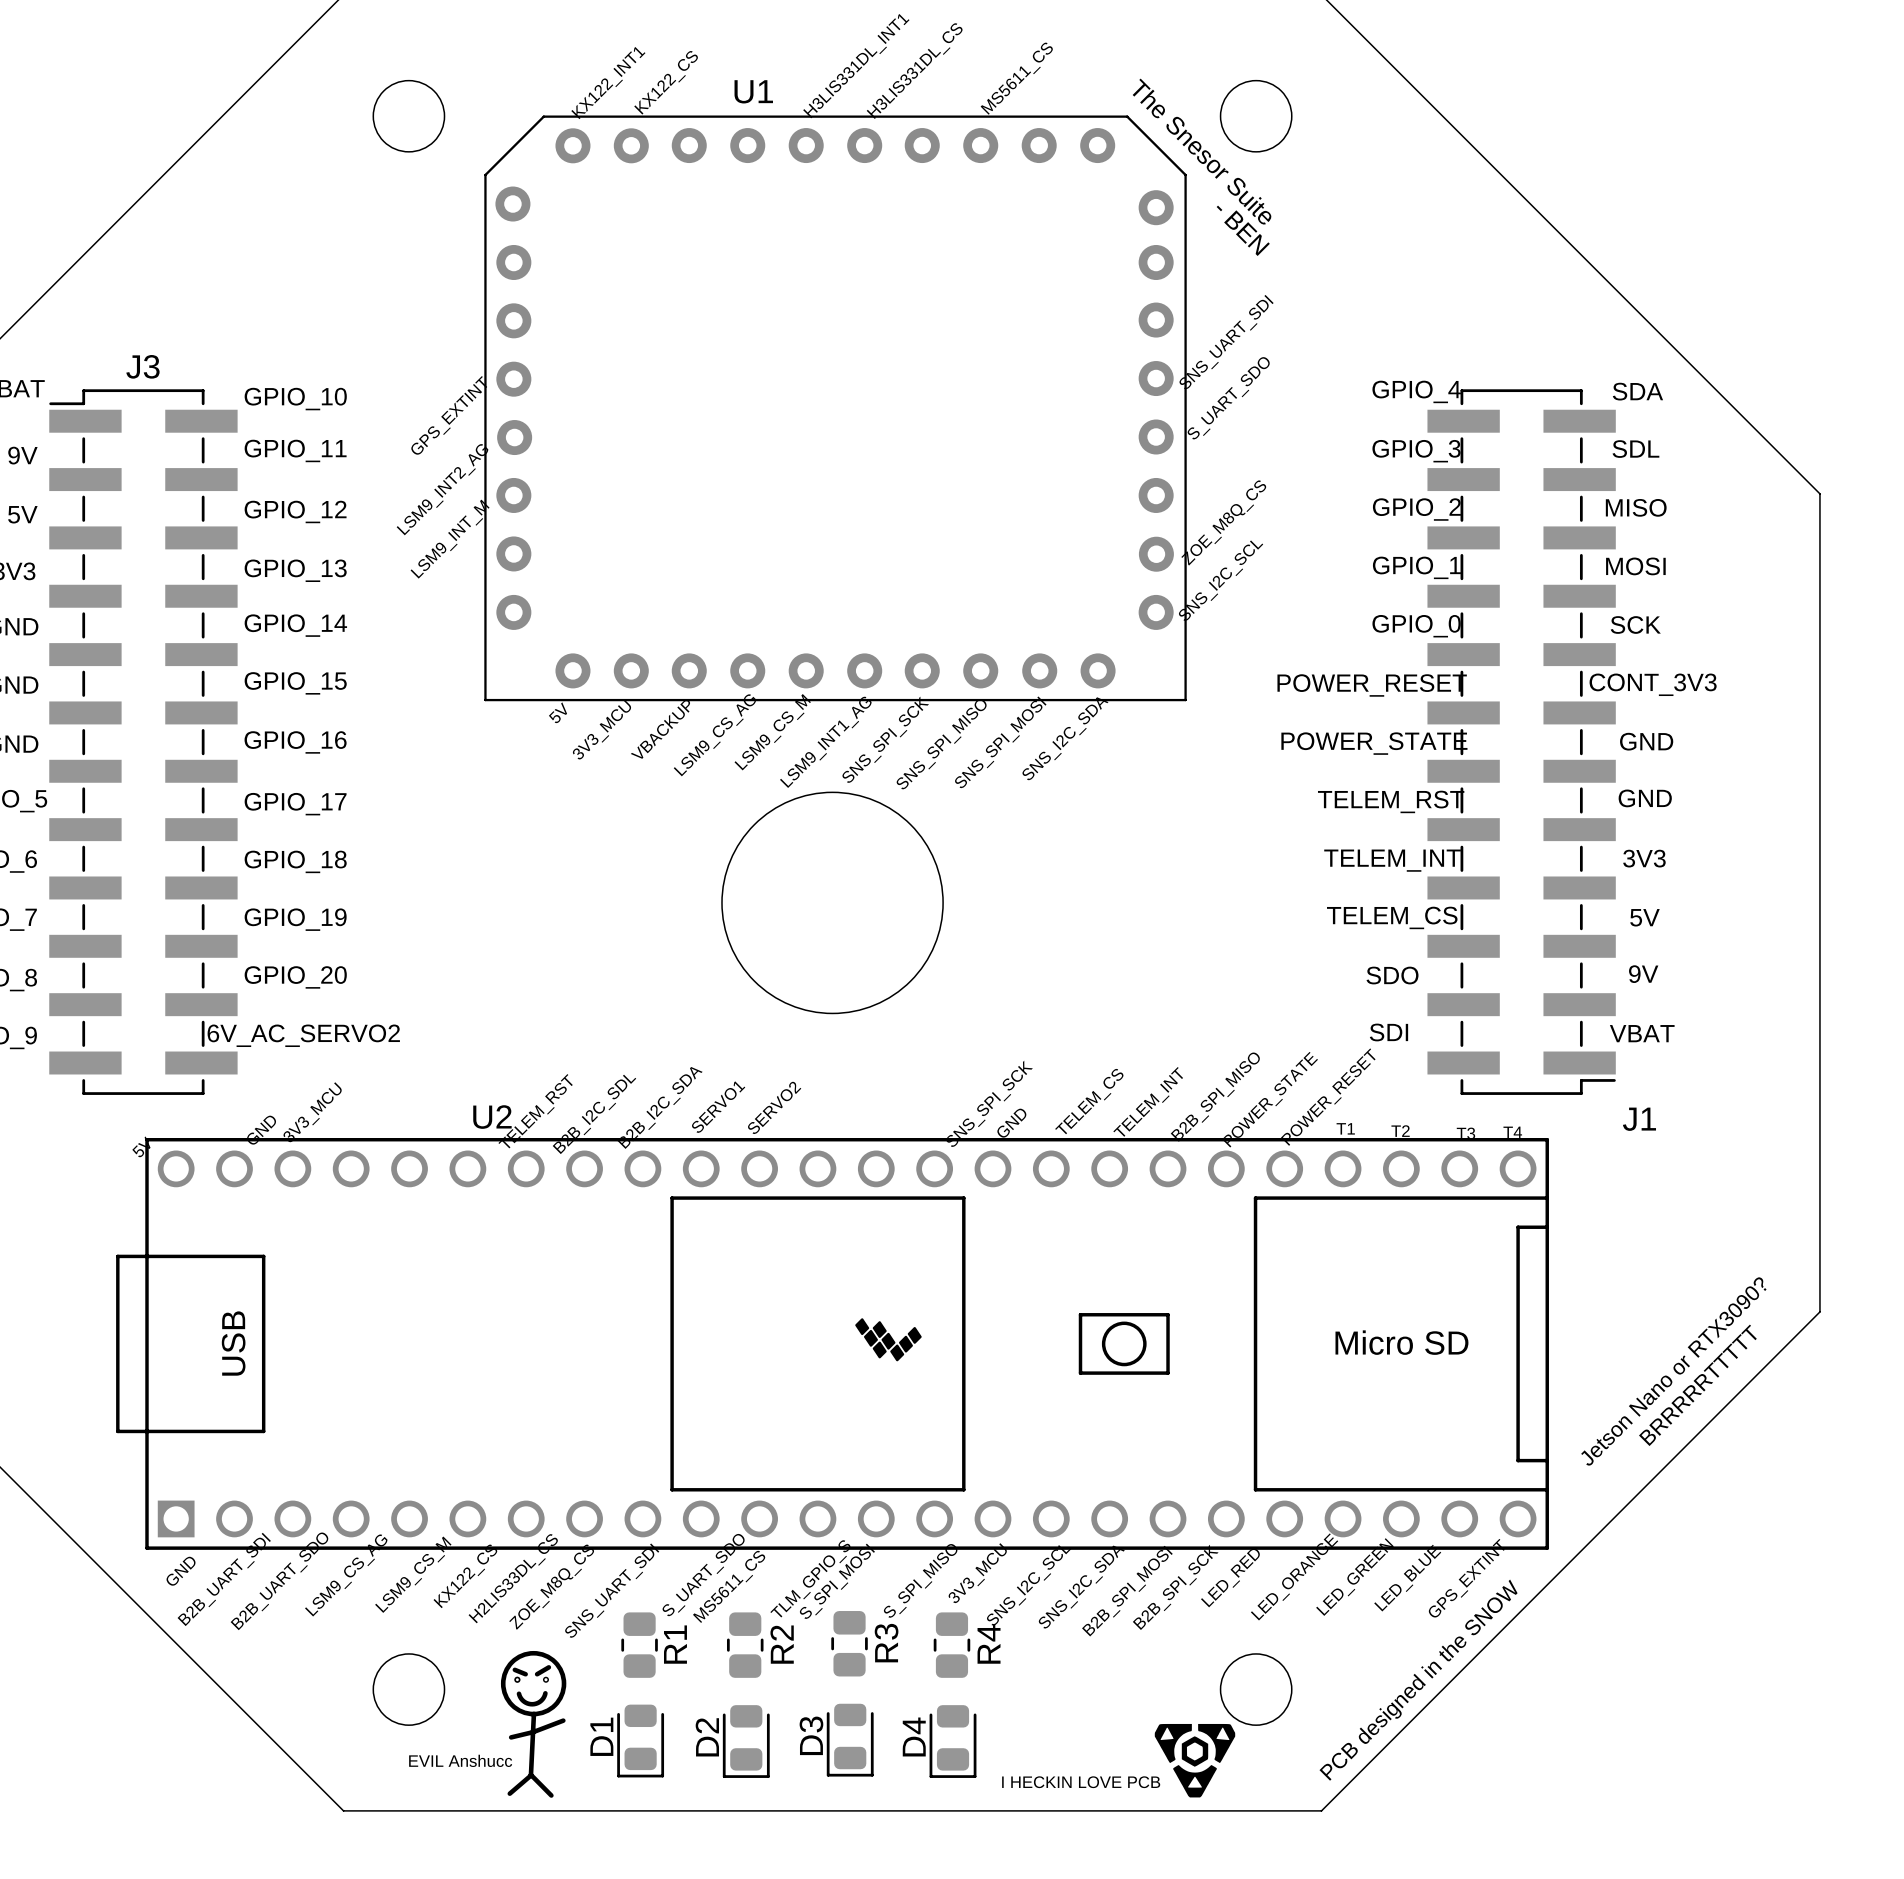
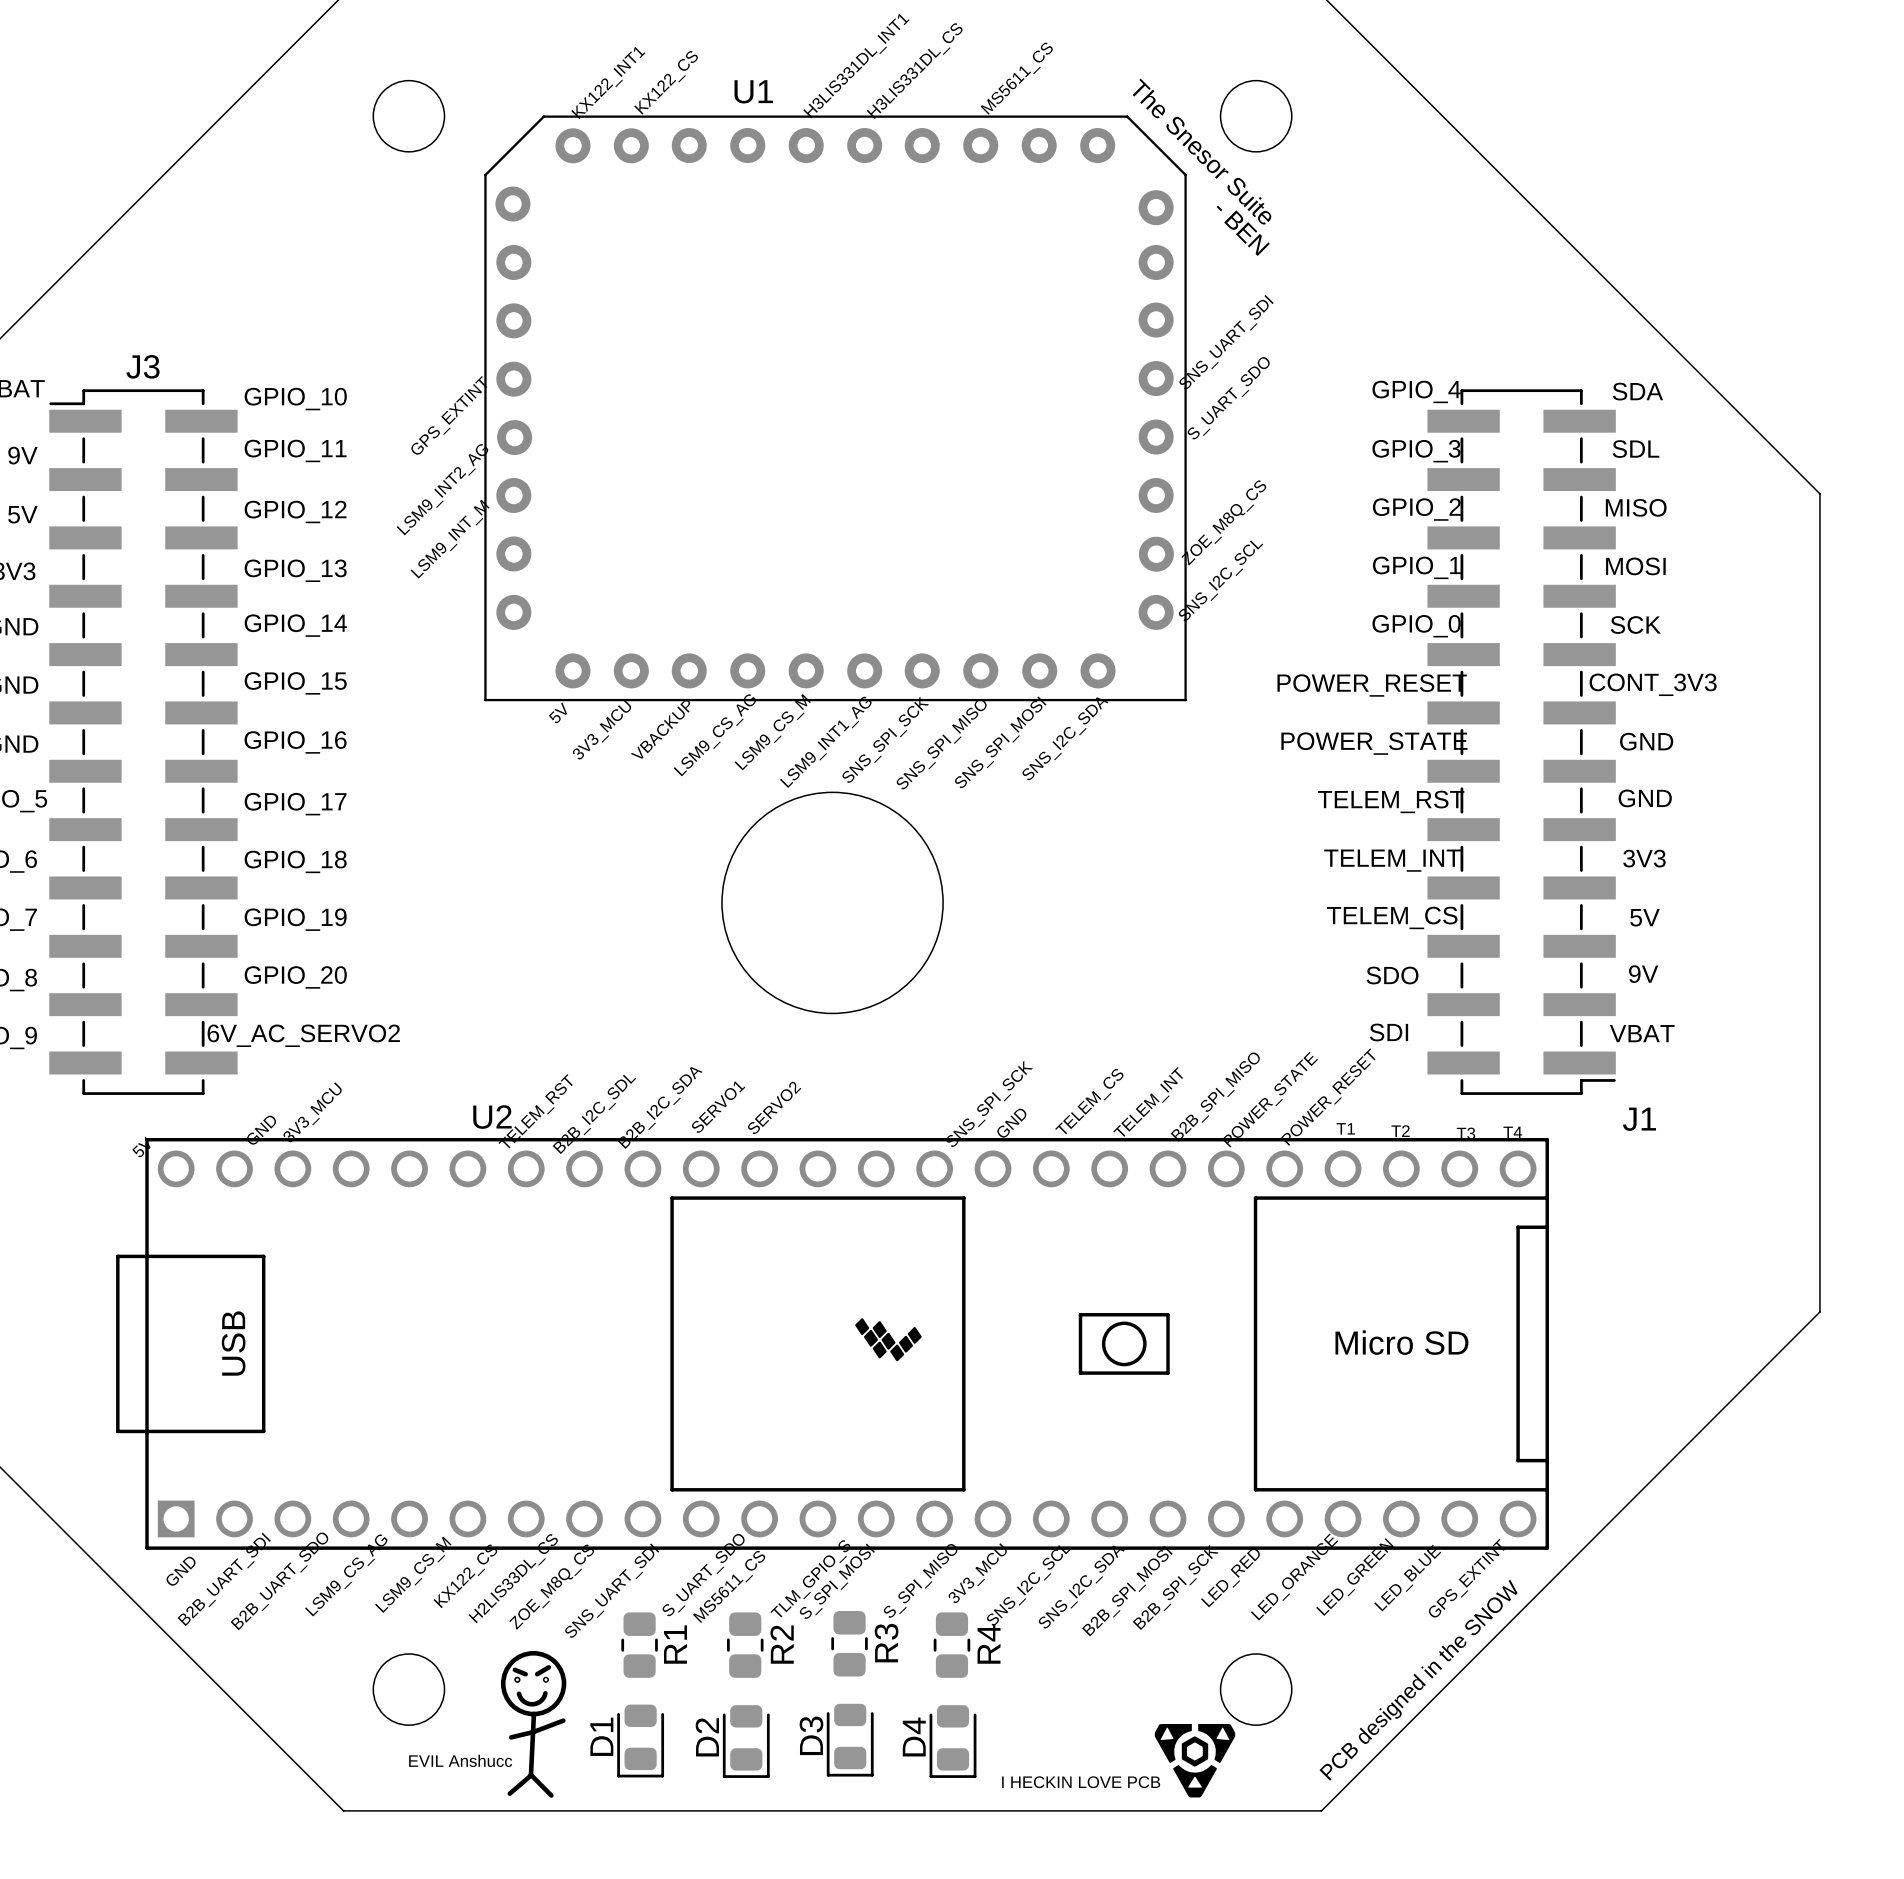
text: Jetson Nano or RTX3090? (1673, 1372) -> none
text: BRRRRRTTTTT (1697, 1385) -> none

